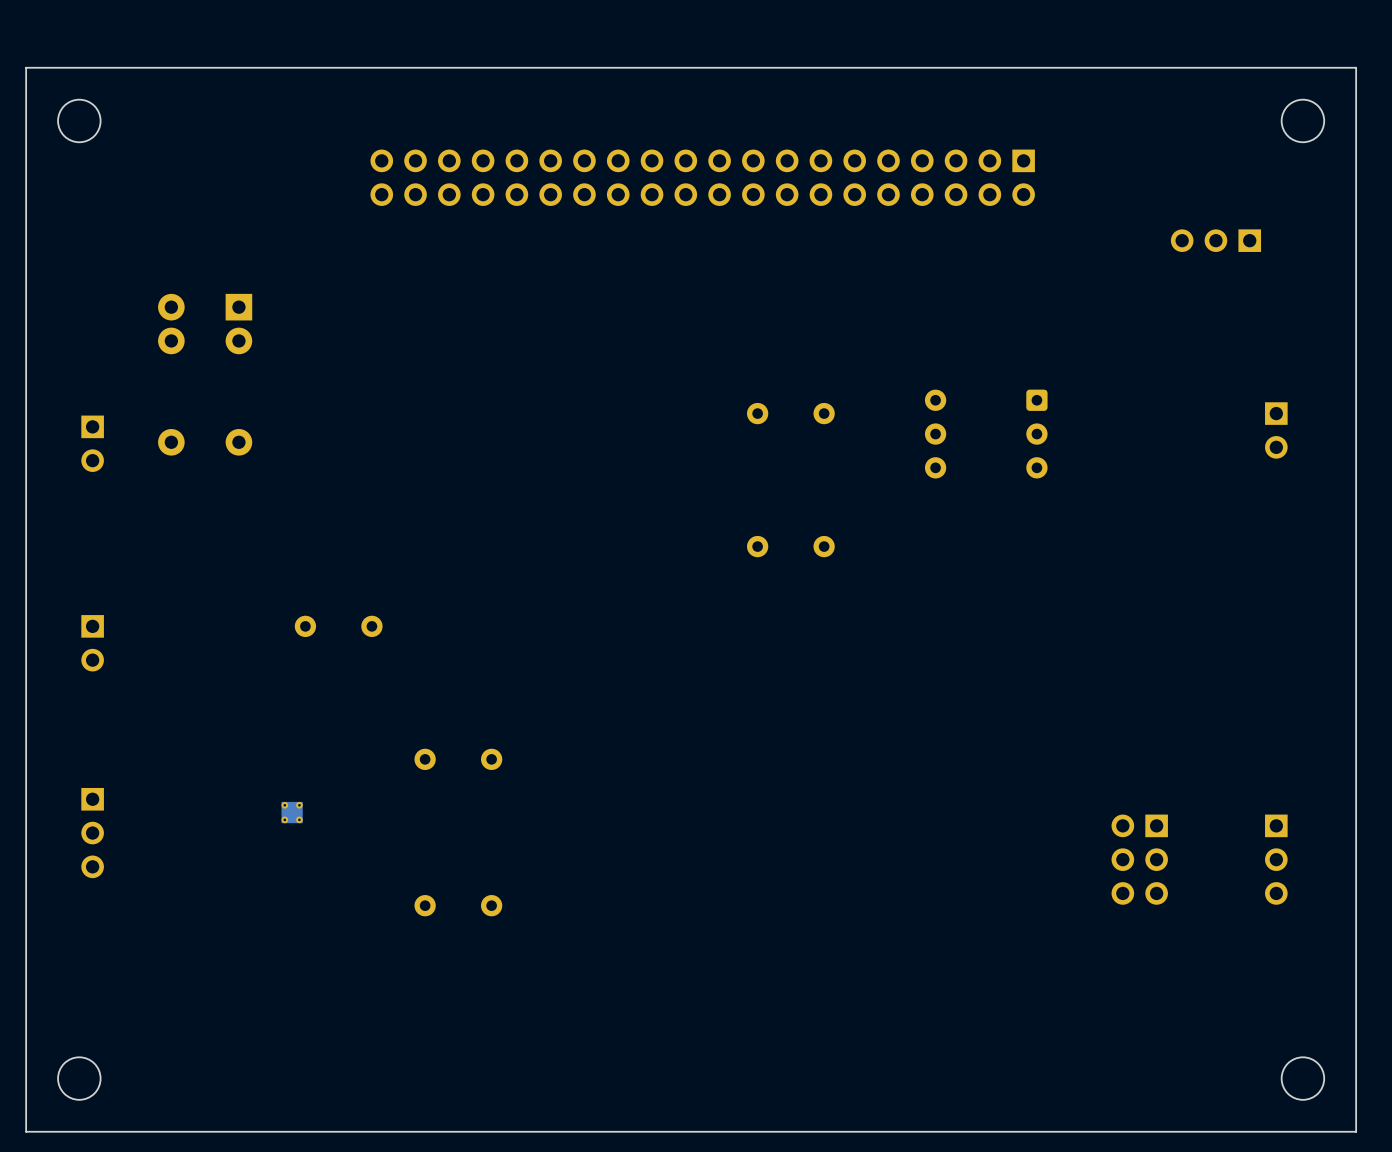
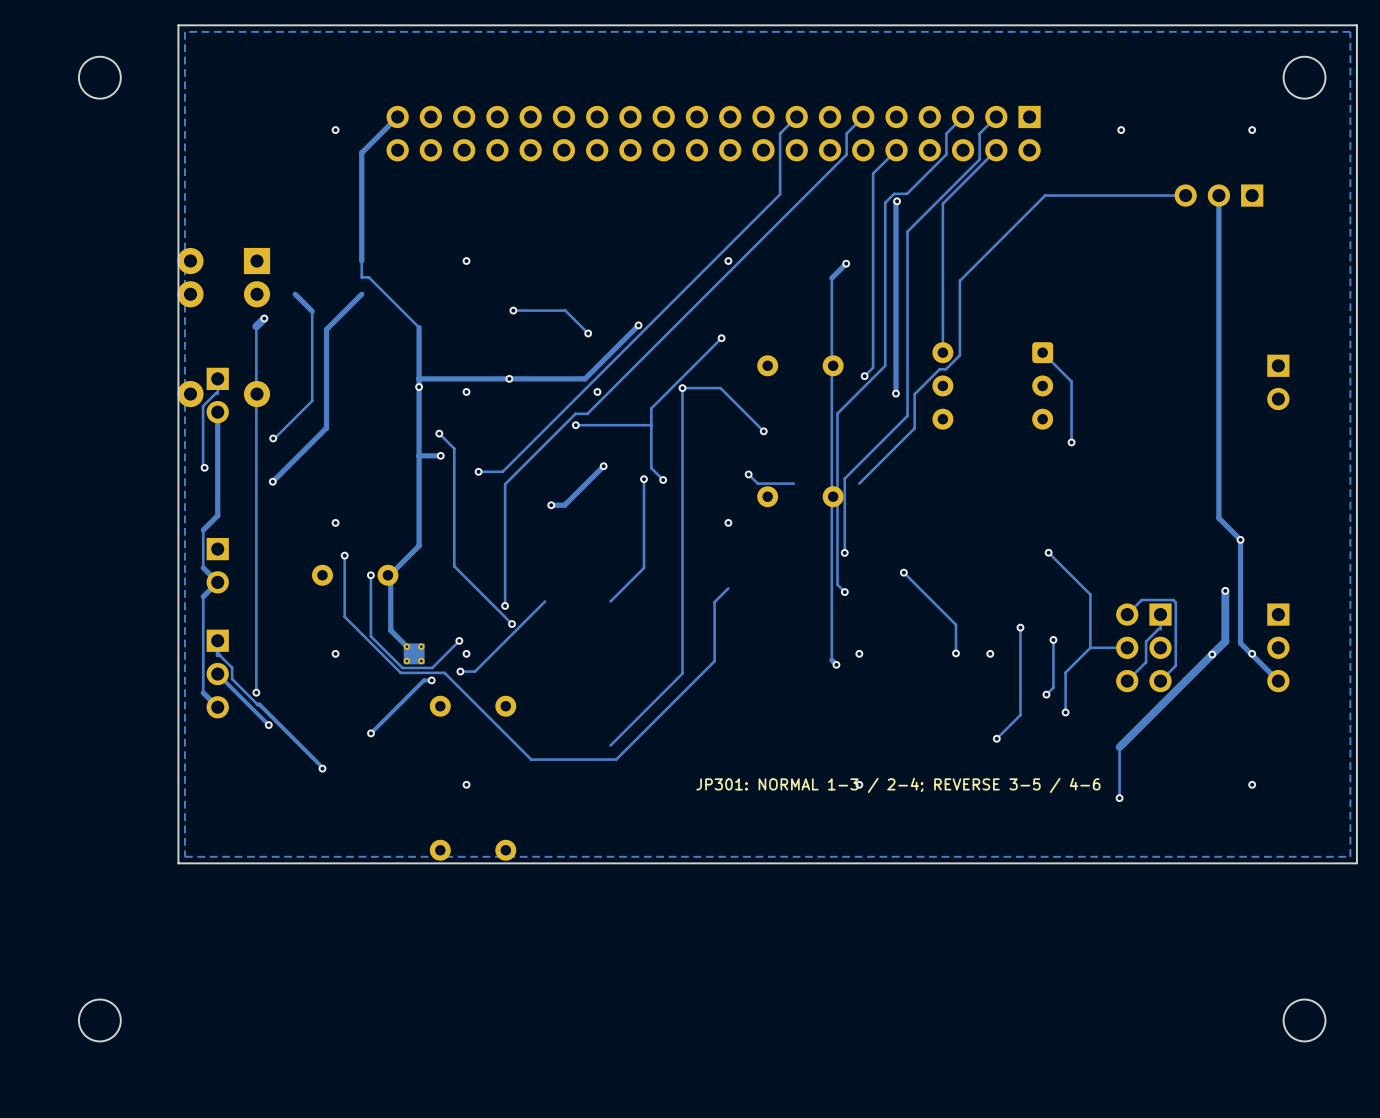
board edge: (159, 67) (26, 67) (26, 1131) (1356, 1131) (1356, 918) -> (178, 25) (178, 863) (1356, 863)
zone outline: none -> (1350, 31) (184, 31) (184, 856) (1350, 856) (1350, 31)
track: none -> (397, 116) (361, 152) (361, 277) (368, 277) (419, 327) (419, 545) (390, 574) (390, 630) (406, 646)
track: none -> (796, 116) (780, 133) (780, 194) (502, 471) (478, 471)
track: none -> (863, 116) (846, 133) (846, 154) (587, 413) (575, 413) (505, 484) (505, 605)
track: none -> (963, 116) (946, 133) (946, 154) (907, 193) (894, 193) (885, 202) (885, 365) (837, 413) (837, 584) (844, 592)
track: none -> (996, 116) (979, 133) (979, 159) (907, 231) (907, 415) (844, 478) (844, 552)
via: none -> (335, 130)
via: none -> (1121, 130)
via: none -> (1252, 130)
track: none -> (896, 150) (873, 173) (873, 367) (864, 376)
track: none -> (996, 150) (942, 203) (942, 352)
track: none -> (1185, 195) (1045, 195) (959, 280) (959, 355) (945, 369) (939, 369) (914, 394) (914, 428) (859, 483)
track: none -> (1218, 195) (1218, 518) (1240, 539) (1240, 643) (1278, 681)
track: none -> (897, 201) (895, 393)
via: none -> (897, 201)
via: none -> (466, 261)
via: none -> (728, 261)
track: none -> (846, 263) (831, 278) (831, 660) (836, 664)
via: none -> (846, 263)
track: none -> (295, 294) (312, 311) (312, 400) (273, 438)
track: none -> (361, 294) (326, 329) (326, 428) (272, 481)
track: none -> (513, 310) (565, 310) (588, 333)
via: none -> (513, 310)
track: none -> (264, 318) (256, 326) (256, 692)
via: none -> (264, 318)
track: none -> (638, 325) (585, 378) (419, 378)
via: none -> (638, 325)
via: none -> (588, 333)
track: none -> (721, 338) (651, 408) (651, 468) (663, 480)
via: none -> (721, 338)
track: none -> (1042, 352) (1071, 381) (1071, 442)
via: none -> (864, 376)
track: none -> (217, 378) (217, 393) (203, 406) (203, 466) (204, 467)
via: none -> (509, 378)
via: none -> (419, 387)
via: none -> (682, 388)
via: none -> (466, 391)
via: none -> (597, 391)
via: none -> (895, 393)
part: (92, 443) -> none
part: none -> (217, 395)
track: none -> (217, 412) (217, 515) (203, 530) (203, 567) (217, 582) (203, 596) (203, 692) (217, 707)
via: none -> (575, 425)
track: none -> (651, 425) (575, 425)
track: none -> (763, 431) (720, 388) (682, 388) (682, 673) (610, 745)
via: none -> (763, 431)
track: none -> (439, 433) (454, 448) (454, 566) (512, 624)
via: none -> (439, 433)
via: none -> (273, 438)
via: none -> (1071, 442)
track: none -> (440, 455) (419, 455)
via: none -> (440, 455)
track: none -> (603, 466) (564, 505) (551, 505)
via: none -> (603, 466)
via: none -> (204, 467)
via: none -> (478, 471)
track: none -> (748, 474) (757, 483) (793, 483)
via: none -> (748, 474)
track: none -> (643, 479) (643, 568) (610, 601)
via: none -> (643, 479)
via: none -> (663, 480)
via: none -> (272, 481)
via: none -> (551, 505)
via: none -> (335, 522)
via: none -> (728, 522)
via: none -> (1240, 539)
via: none -> (844, 552)
track: none -> (1048, 552) (1090, 594) (1090, 647)
via: none -> (1048, 552)
track: none -> (344, 555) (344, 616) (400, 672) (444, 672) (531, 759) (616, 759) (714, 661) (714, 602) (728, 588)
via: none -> (344, 555)
part: none -> (217, 565)
track: none -> (903, 572) (955, 624) (955, 653)
via: none -> (903, 572)
track: none -> (370, 575) (370, 636) (402, 667) (432, 667) (459, 640)
via: none -> (370, 575)
track: none -> (1225, 590) (1225, 641) (1119, 747) (1119, 798)
via: none -> (1225, 590)
part: (92, 643) -> none
via: none -> (844, 592)
track: none -> (545, 601) (474, 671) (460, 671)
via: none -> (505, 605)
track: none -> (1127, 614) (1141, 600) (1173, 600) (1175, 602) (1175, 665) (1160, 681)
track: none -> (1160, 614) (1160, 628) (1146, 641) (1146, 662) (1127, 681)
via: none -> (512, 624)
track: none -> (1020, 627) (1020, 715) (996, 738)
via: none -> (1020, 627)
track: none -> (217, 640) (217, 655) (232, 667) (232, 679) (322, 768)
track: none -> (1053, 639) (1053, 687) (1046, 694)
via: none -> (1053, 639)
via: none -> (459, 640)
track: none -> (1090, 647) (1065, 672) (1065, 712)
track: none -> (1127, 647) (1090, 647)
via: none -> (955, 653)
via: none -> (335, 653)
via: none -> (466, 653)
via: none -> (859, 653)
via: none -> (990, 653)
via: none -> (1212, 654)
via: none -> (1252, 653)
via: none -> (836, 664)
via: none -> (460, 671)
track: none -> (217, 674) (268, 725)
track: none -> (431, 680) (423, 680) (370, 733)
via: none -> (431, 680)
via: none -> (256, 692)
via: none -> (1046, 694)
via: none -> (1065, 712)
via: none -> (268, 725)
via: none -> (370, 733)
via: none -> (996, 738)
part position: (292, 812) -> (414, 653)
via: none -> (322, 768)
part position: (92, 833) -> (217, 674)
via: none -> (466, 784)
via: none -> (859, 784)
text: none -> JP301: NORMAL 1-3 / 2-4; REVERSE 3-5 / 4-6 (898, 785)
via: none -> (1252, 784)
via: none -> (1119, 798)
part position: (1139, 859) -> (1143, 647)
part position: (1276, 859) -> (1278, 647)

